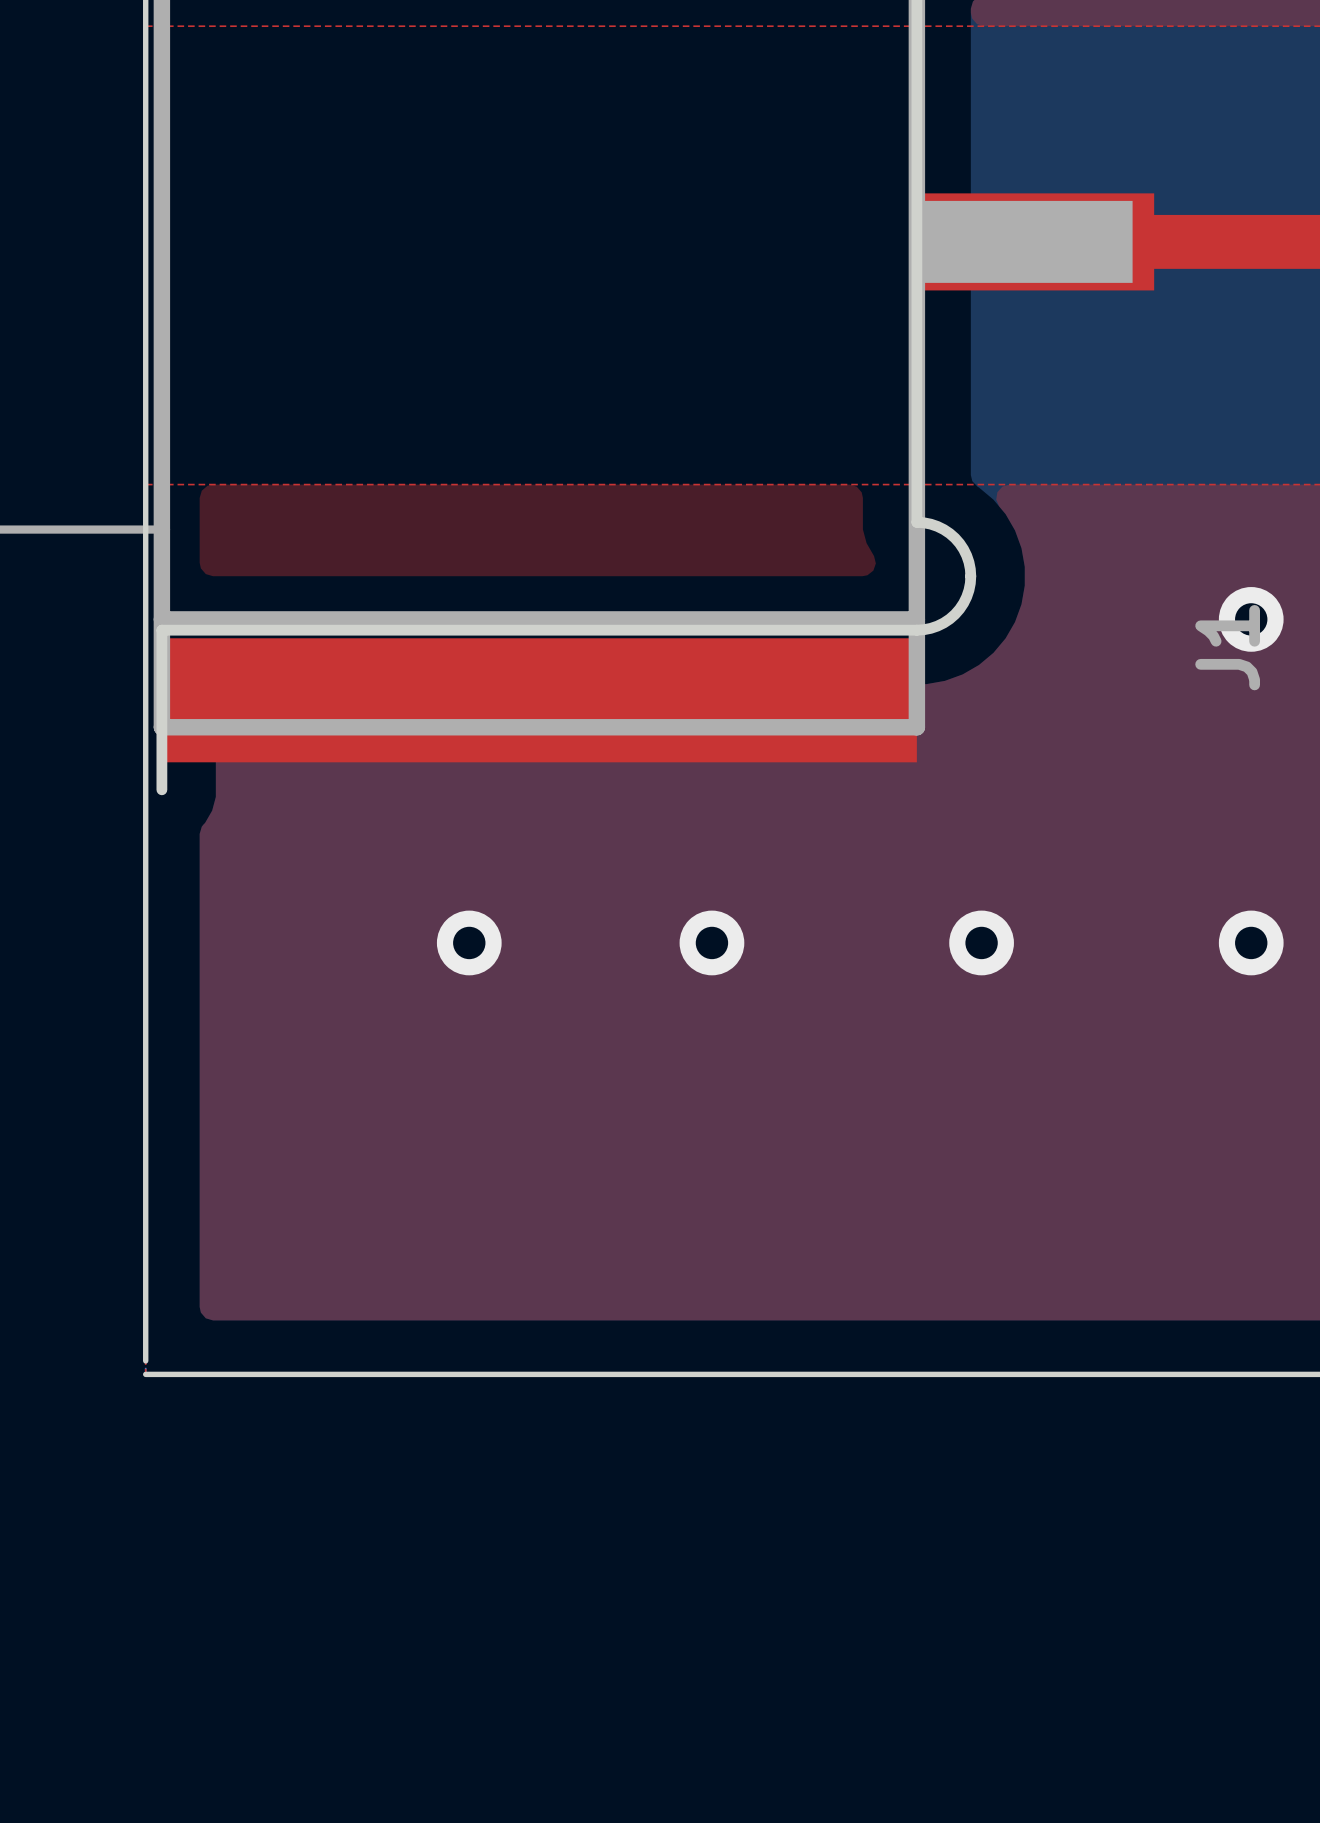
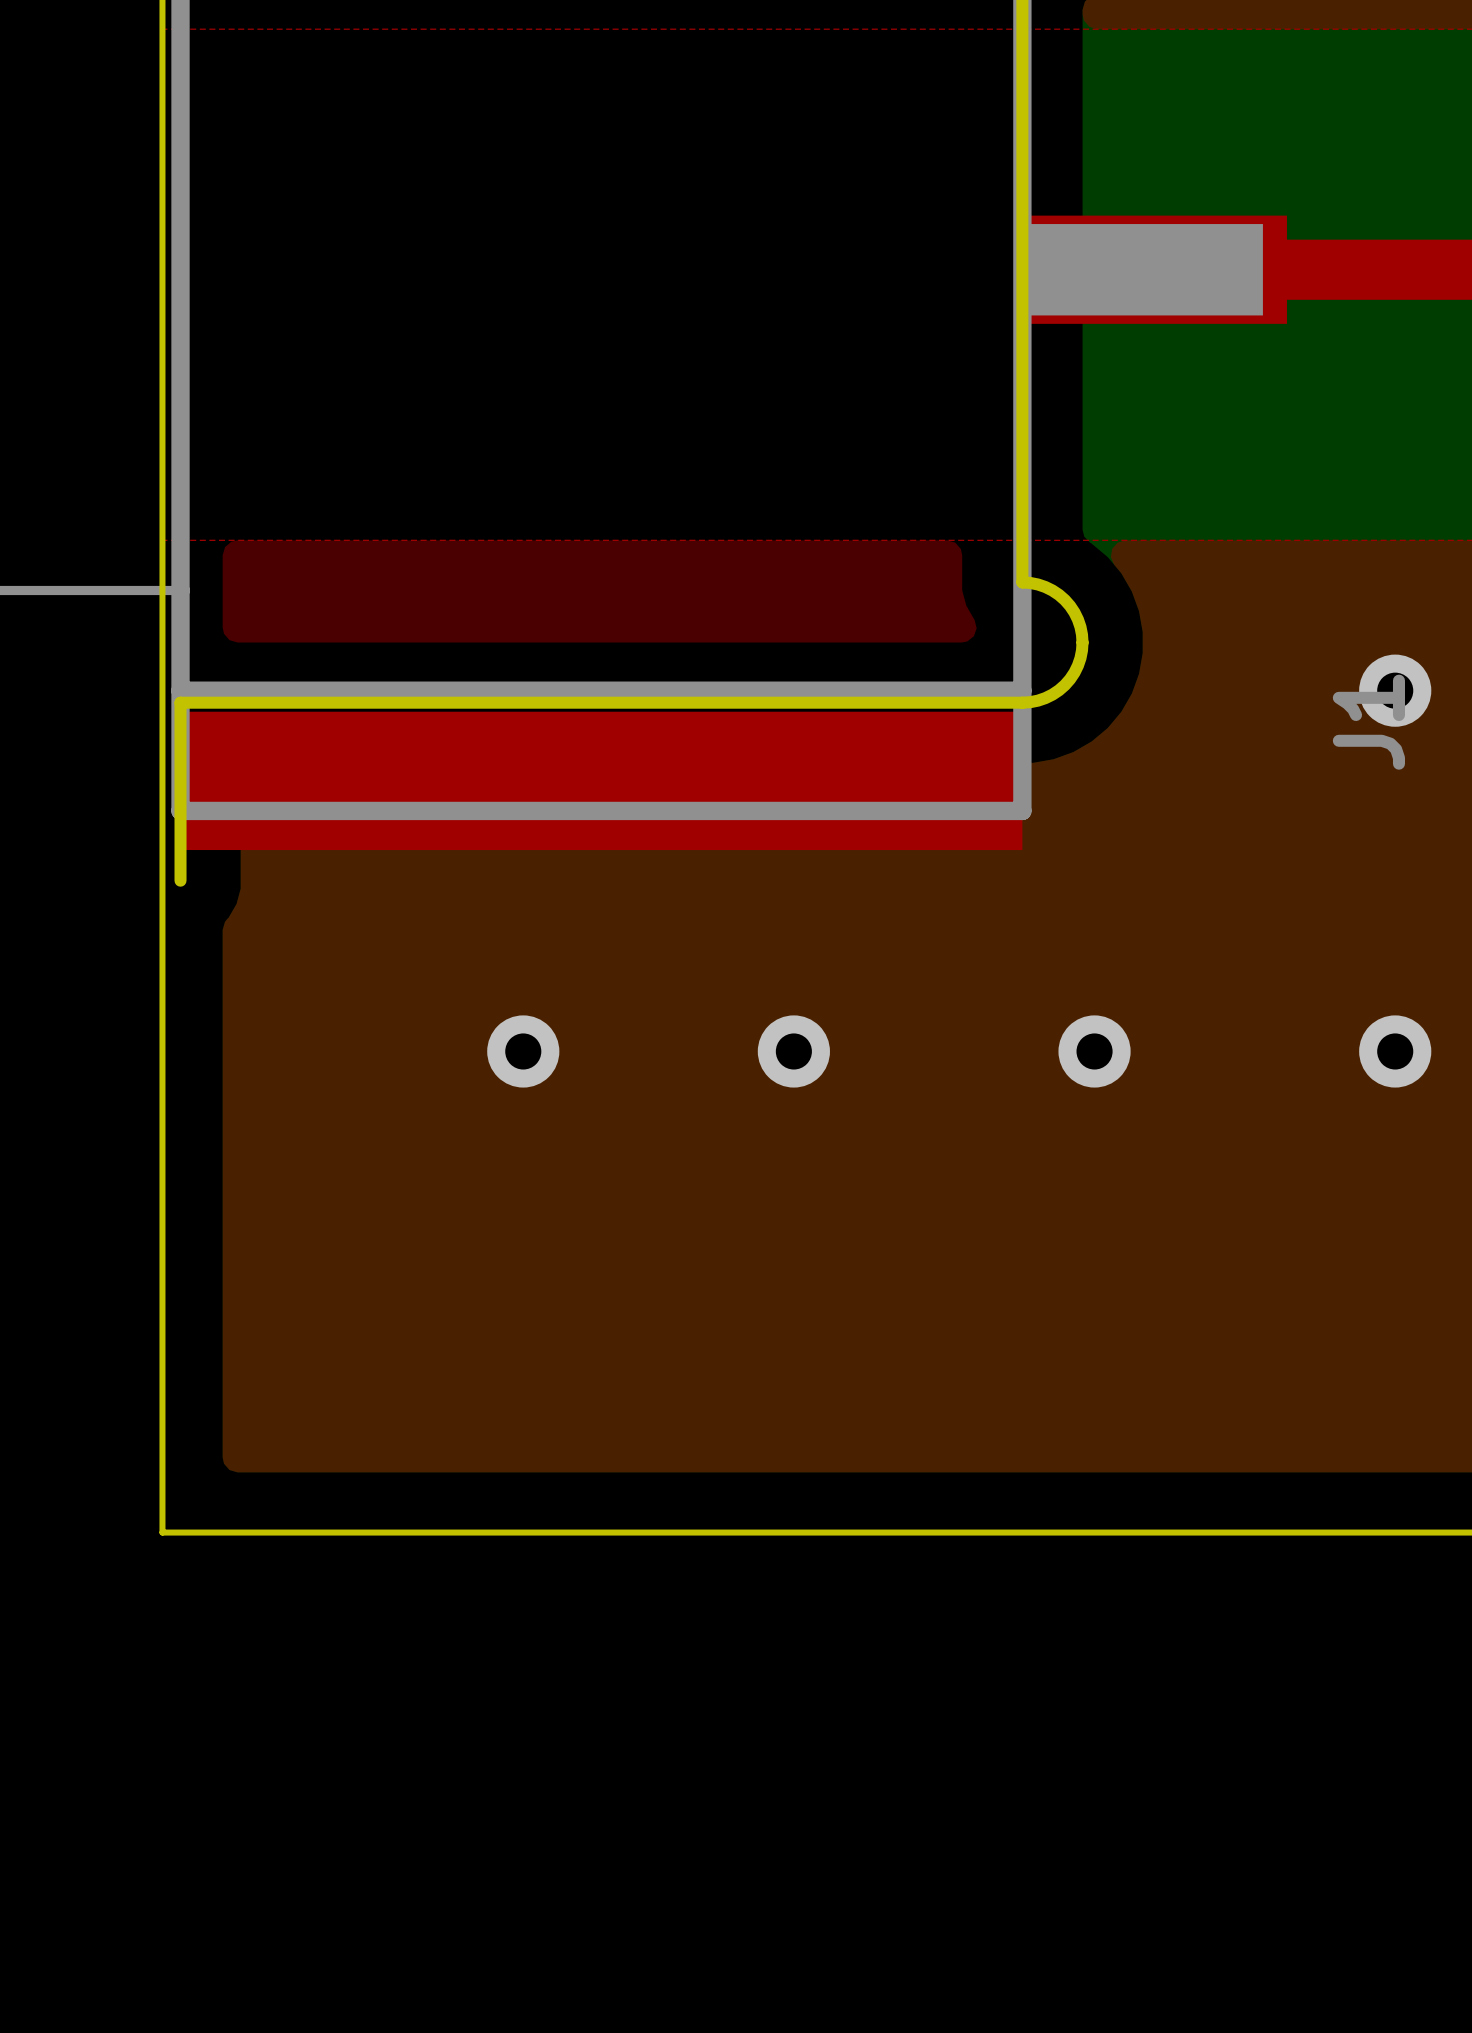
board edge: none -> (162, 1517) (162, 1532)

